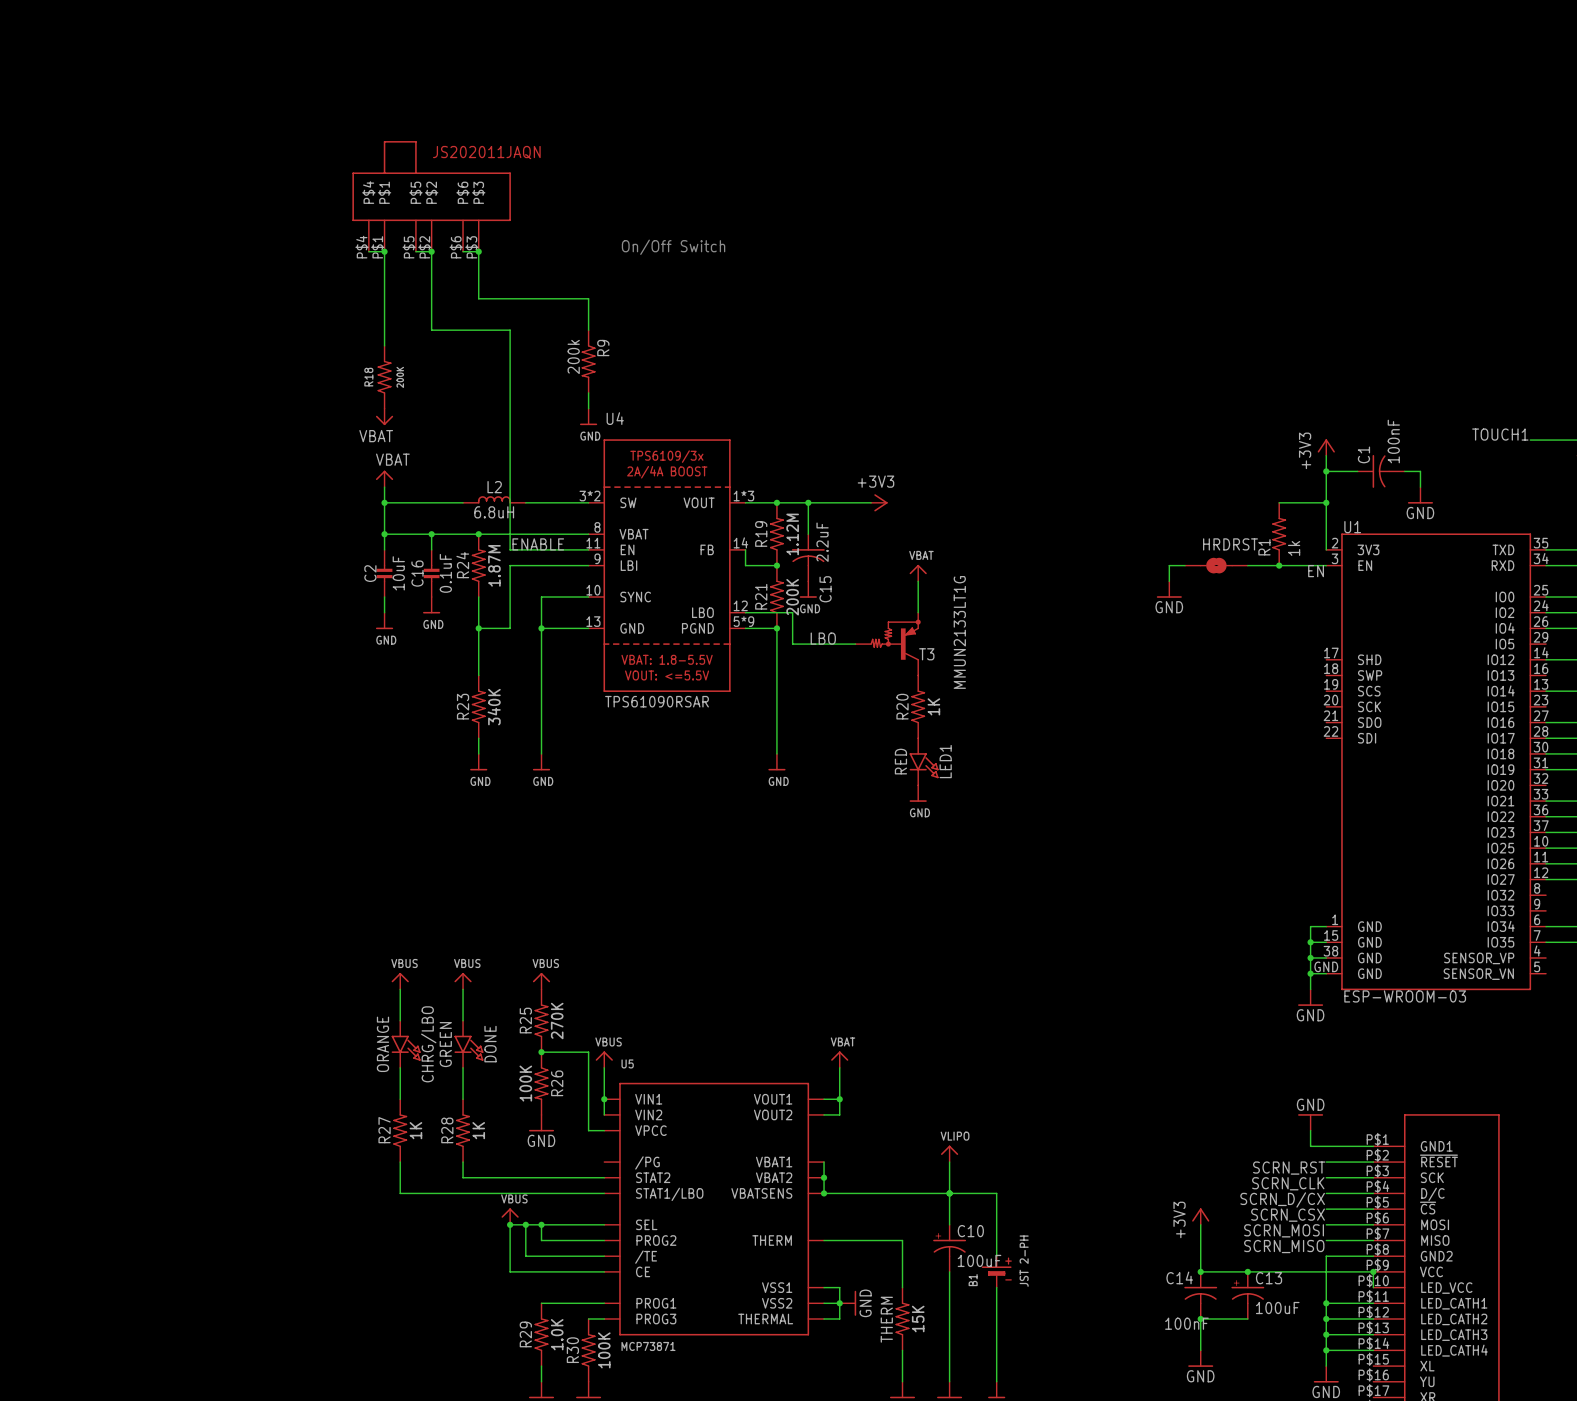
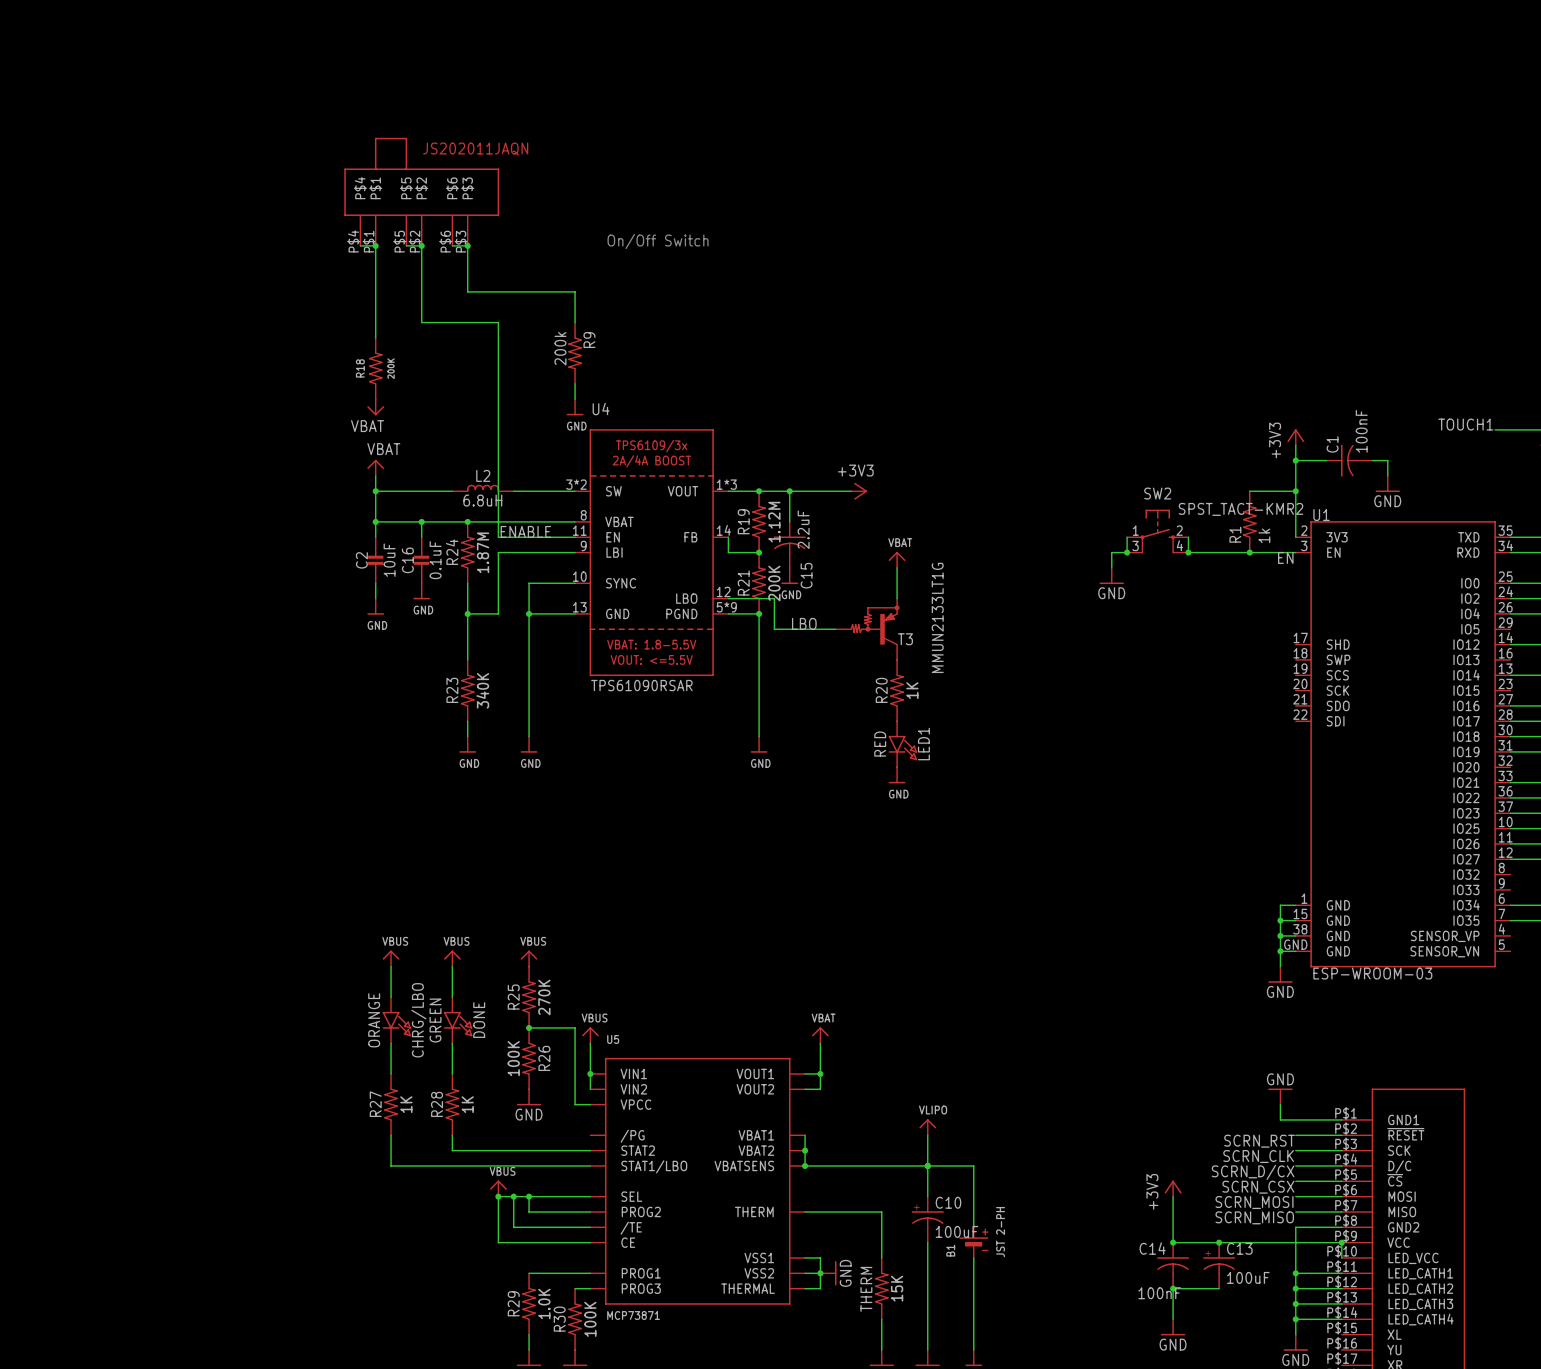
SW2: none -> SPST_TACT-KMR2 (1157, 531)
wire: none -> (1127, 537) (1127, 552) (1111, 552) (1111, 567)
junction: none -> (1127, 552)
wire: (1185, 565) (1169, 565) (1169, 581) -> none
HRDRST: (1216, 565) -> none
junction: none -> (1188, 552)
power symbol position: GND (1169, 589) -> GND (1111, 575)

